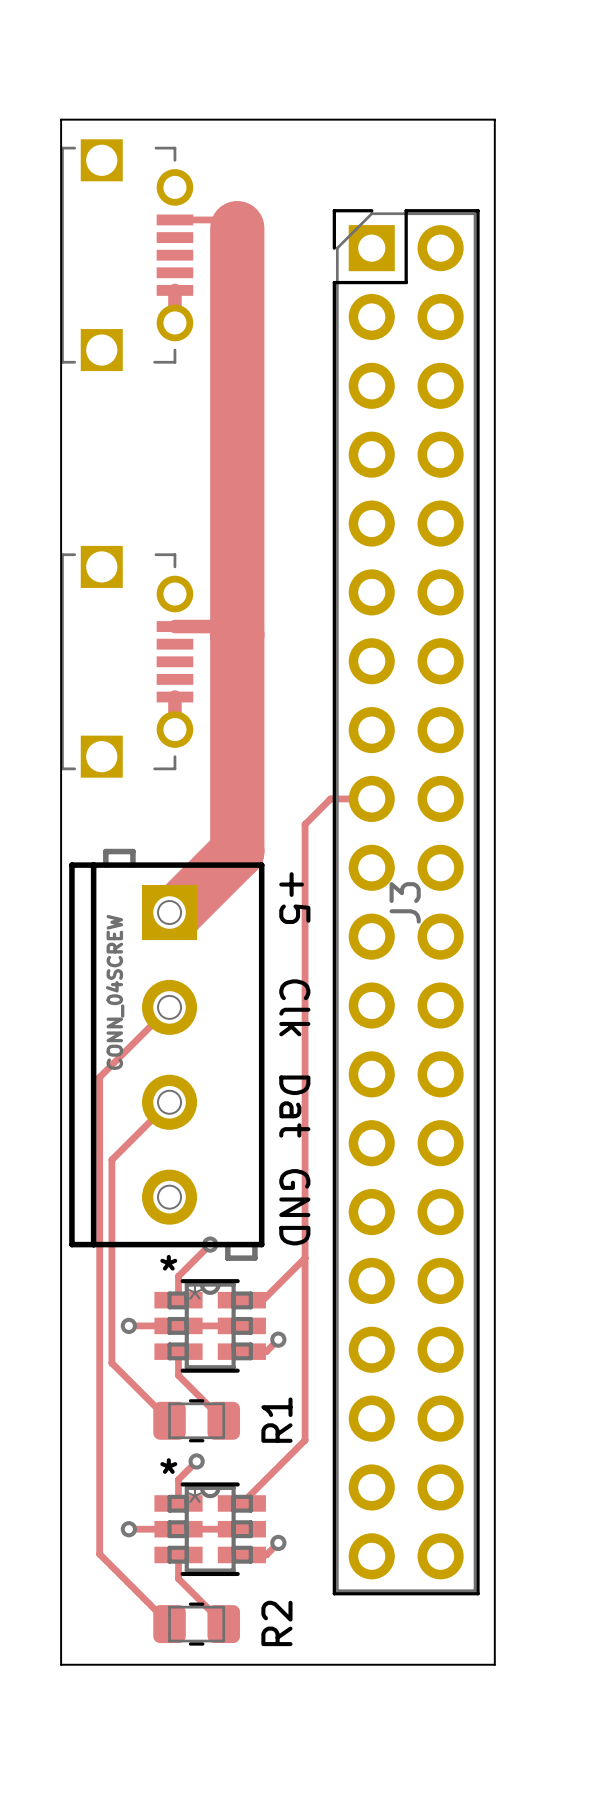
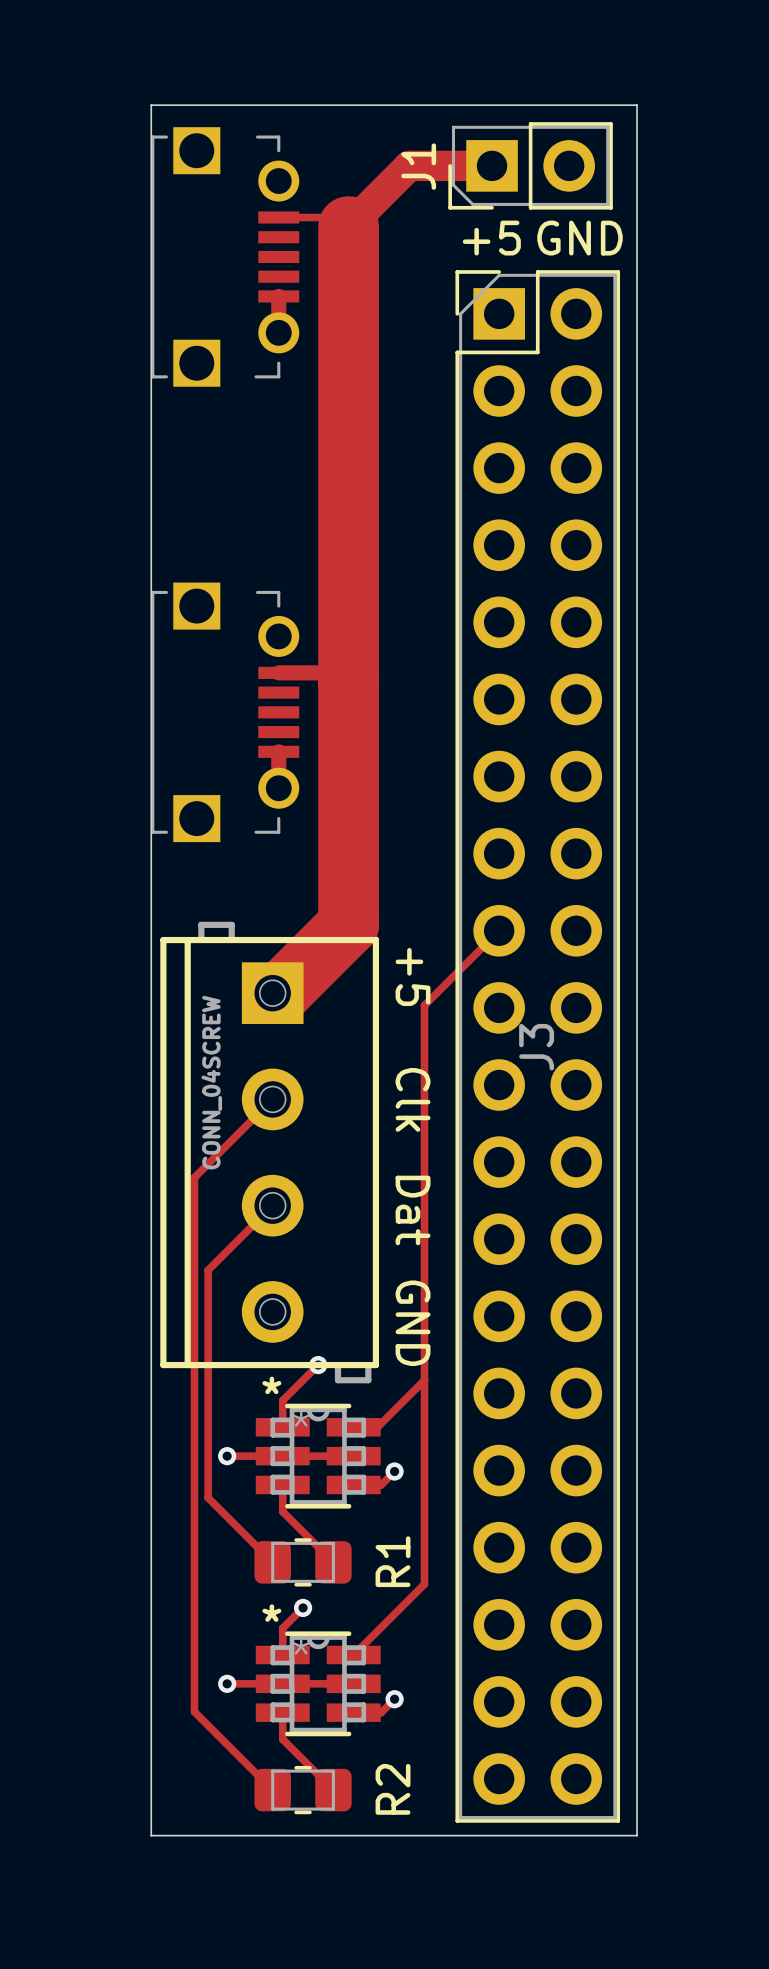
track: none -> (492, 165) (409, 165) (348, 226)
J1: none -> (530, 165)
text: none -> +5 (491, 238)
text: none -> GND (580, 238)
track: (371, 798) (330, 798) (305, 824) (305, 923) -> (499, 930) (424, 1005)
J3 position: (406, 902) -> (537, 1046)

